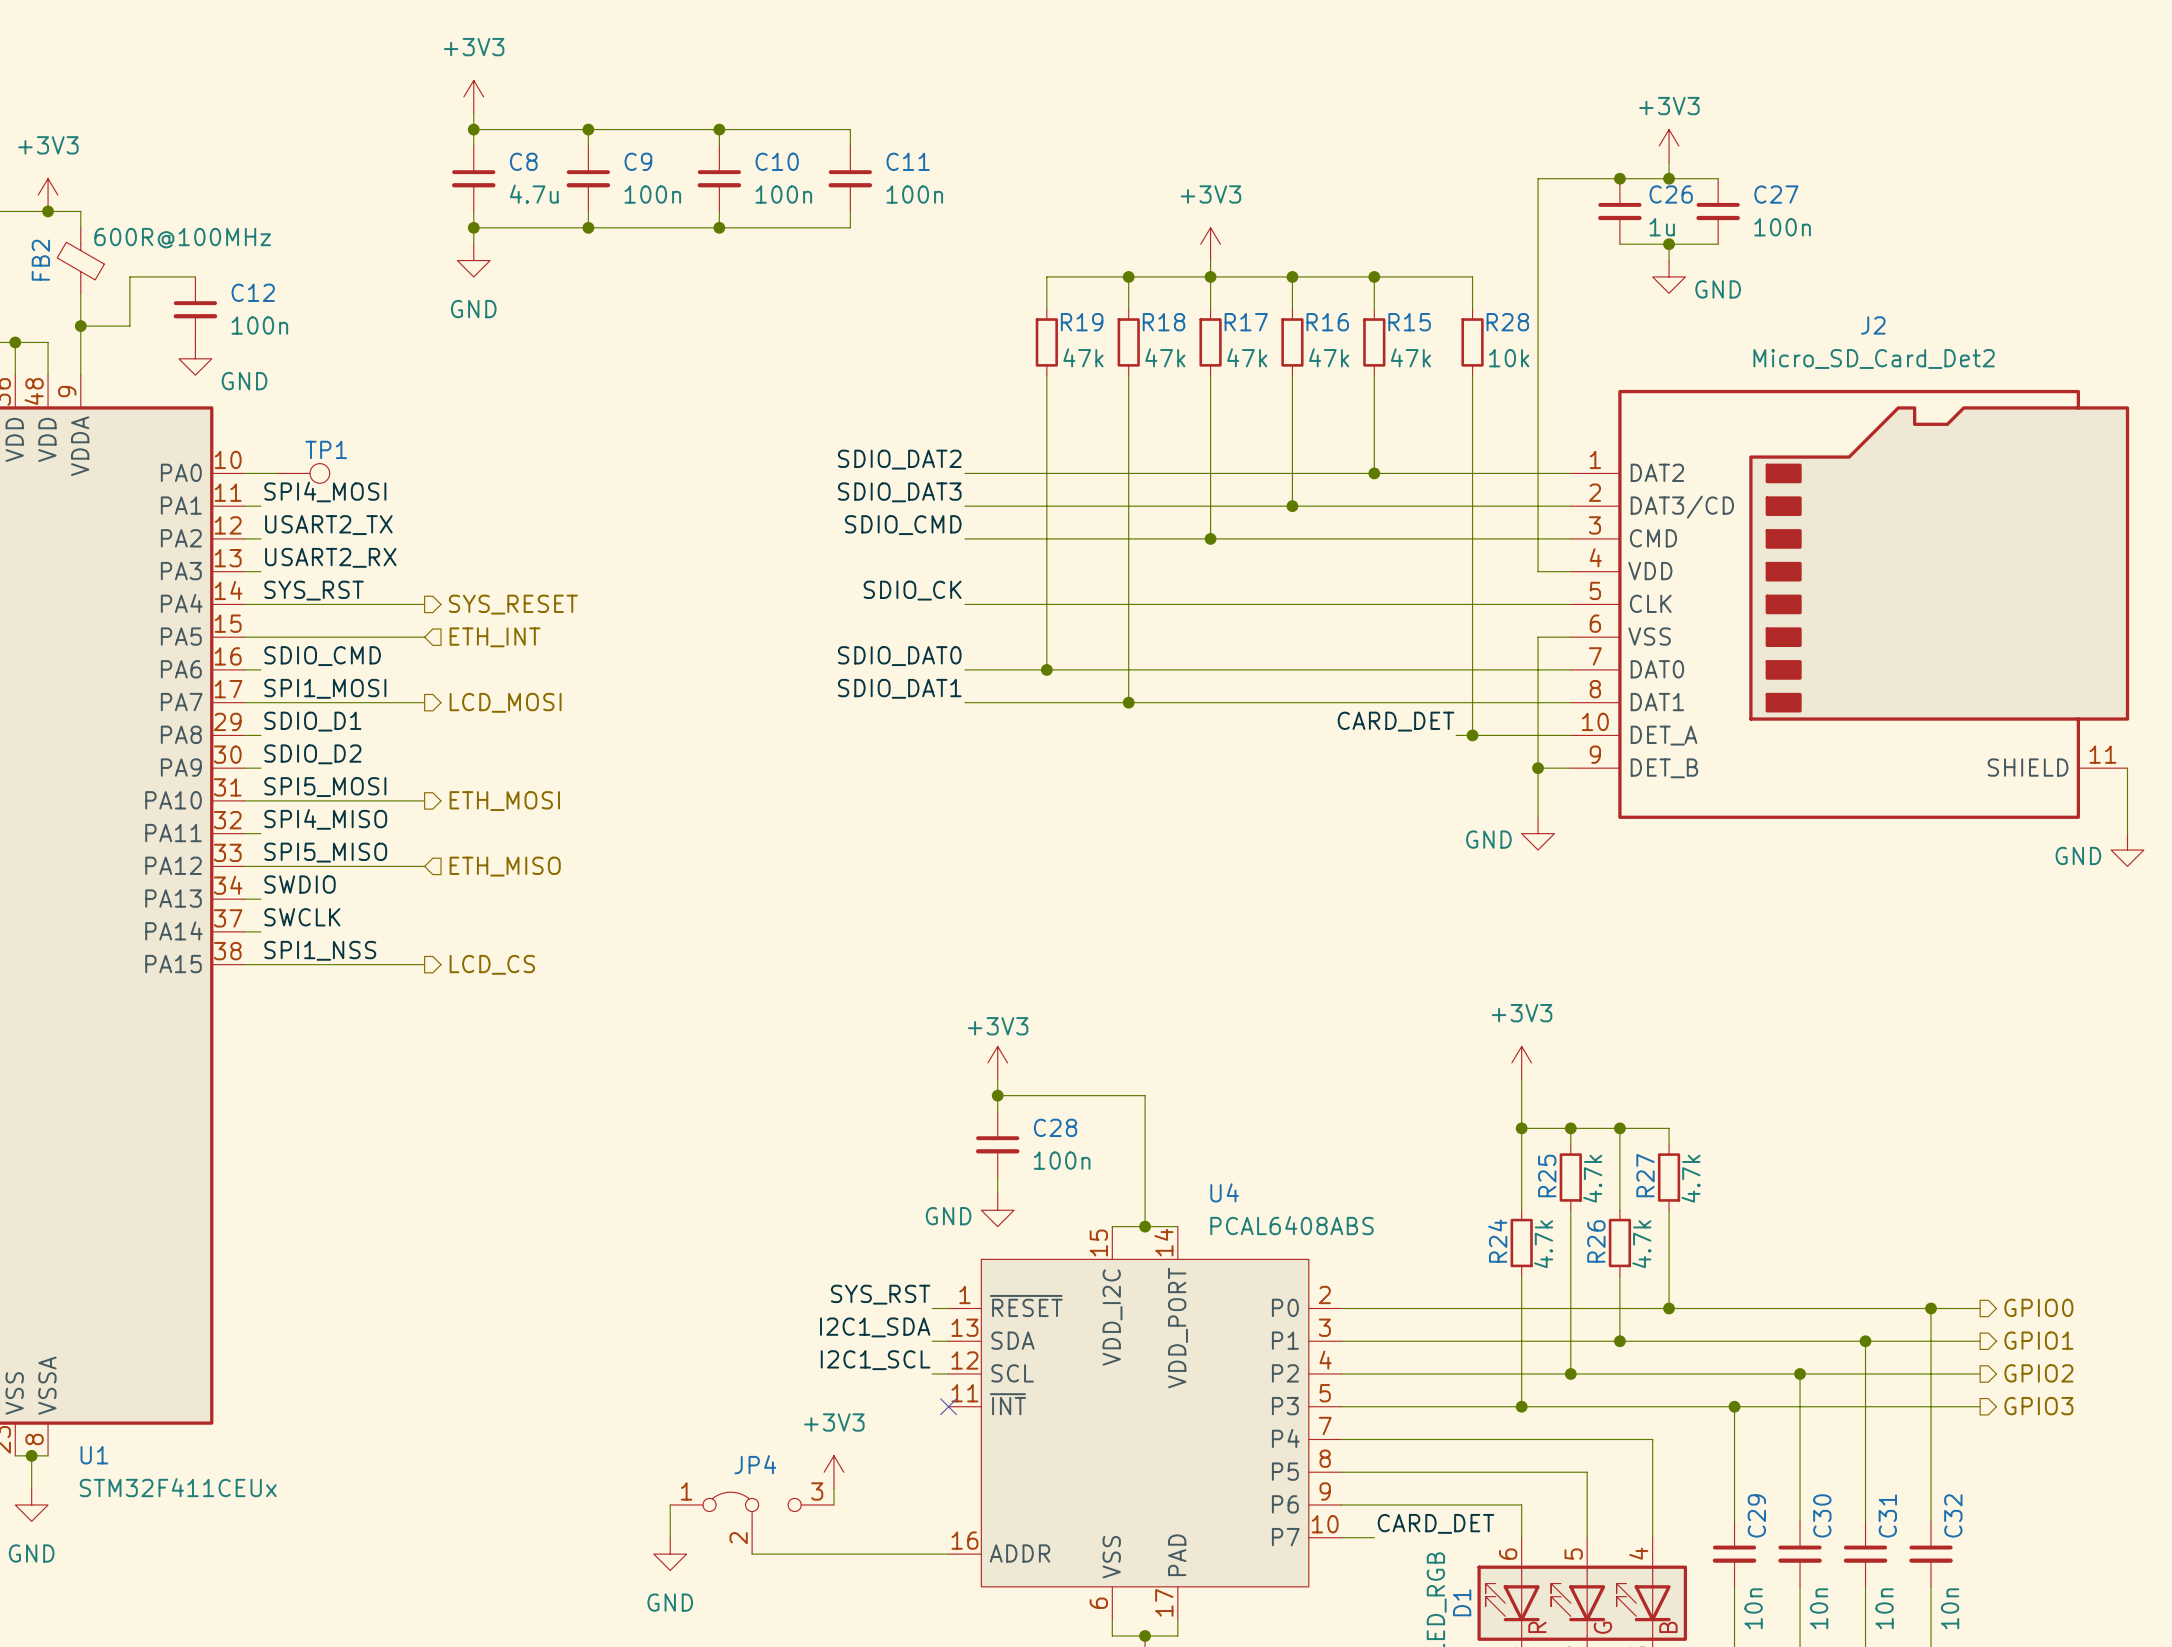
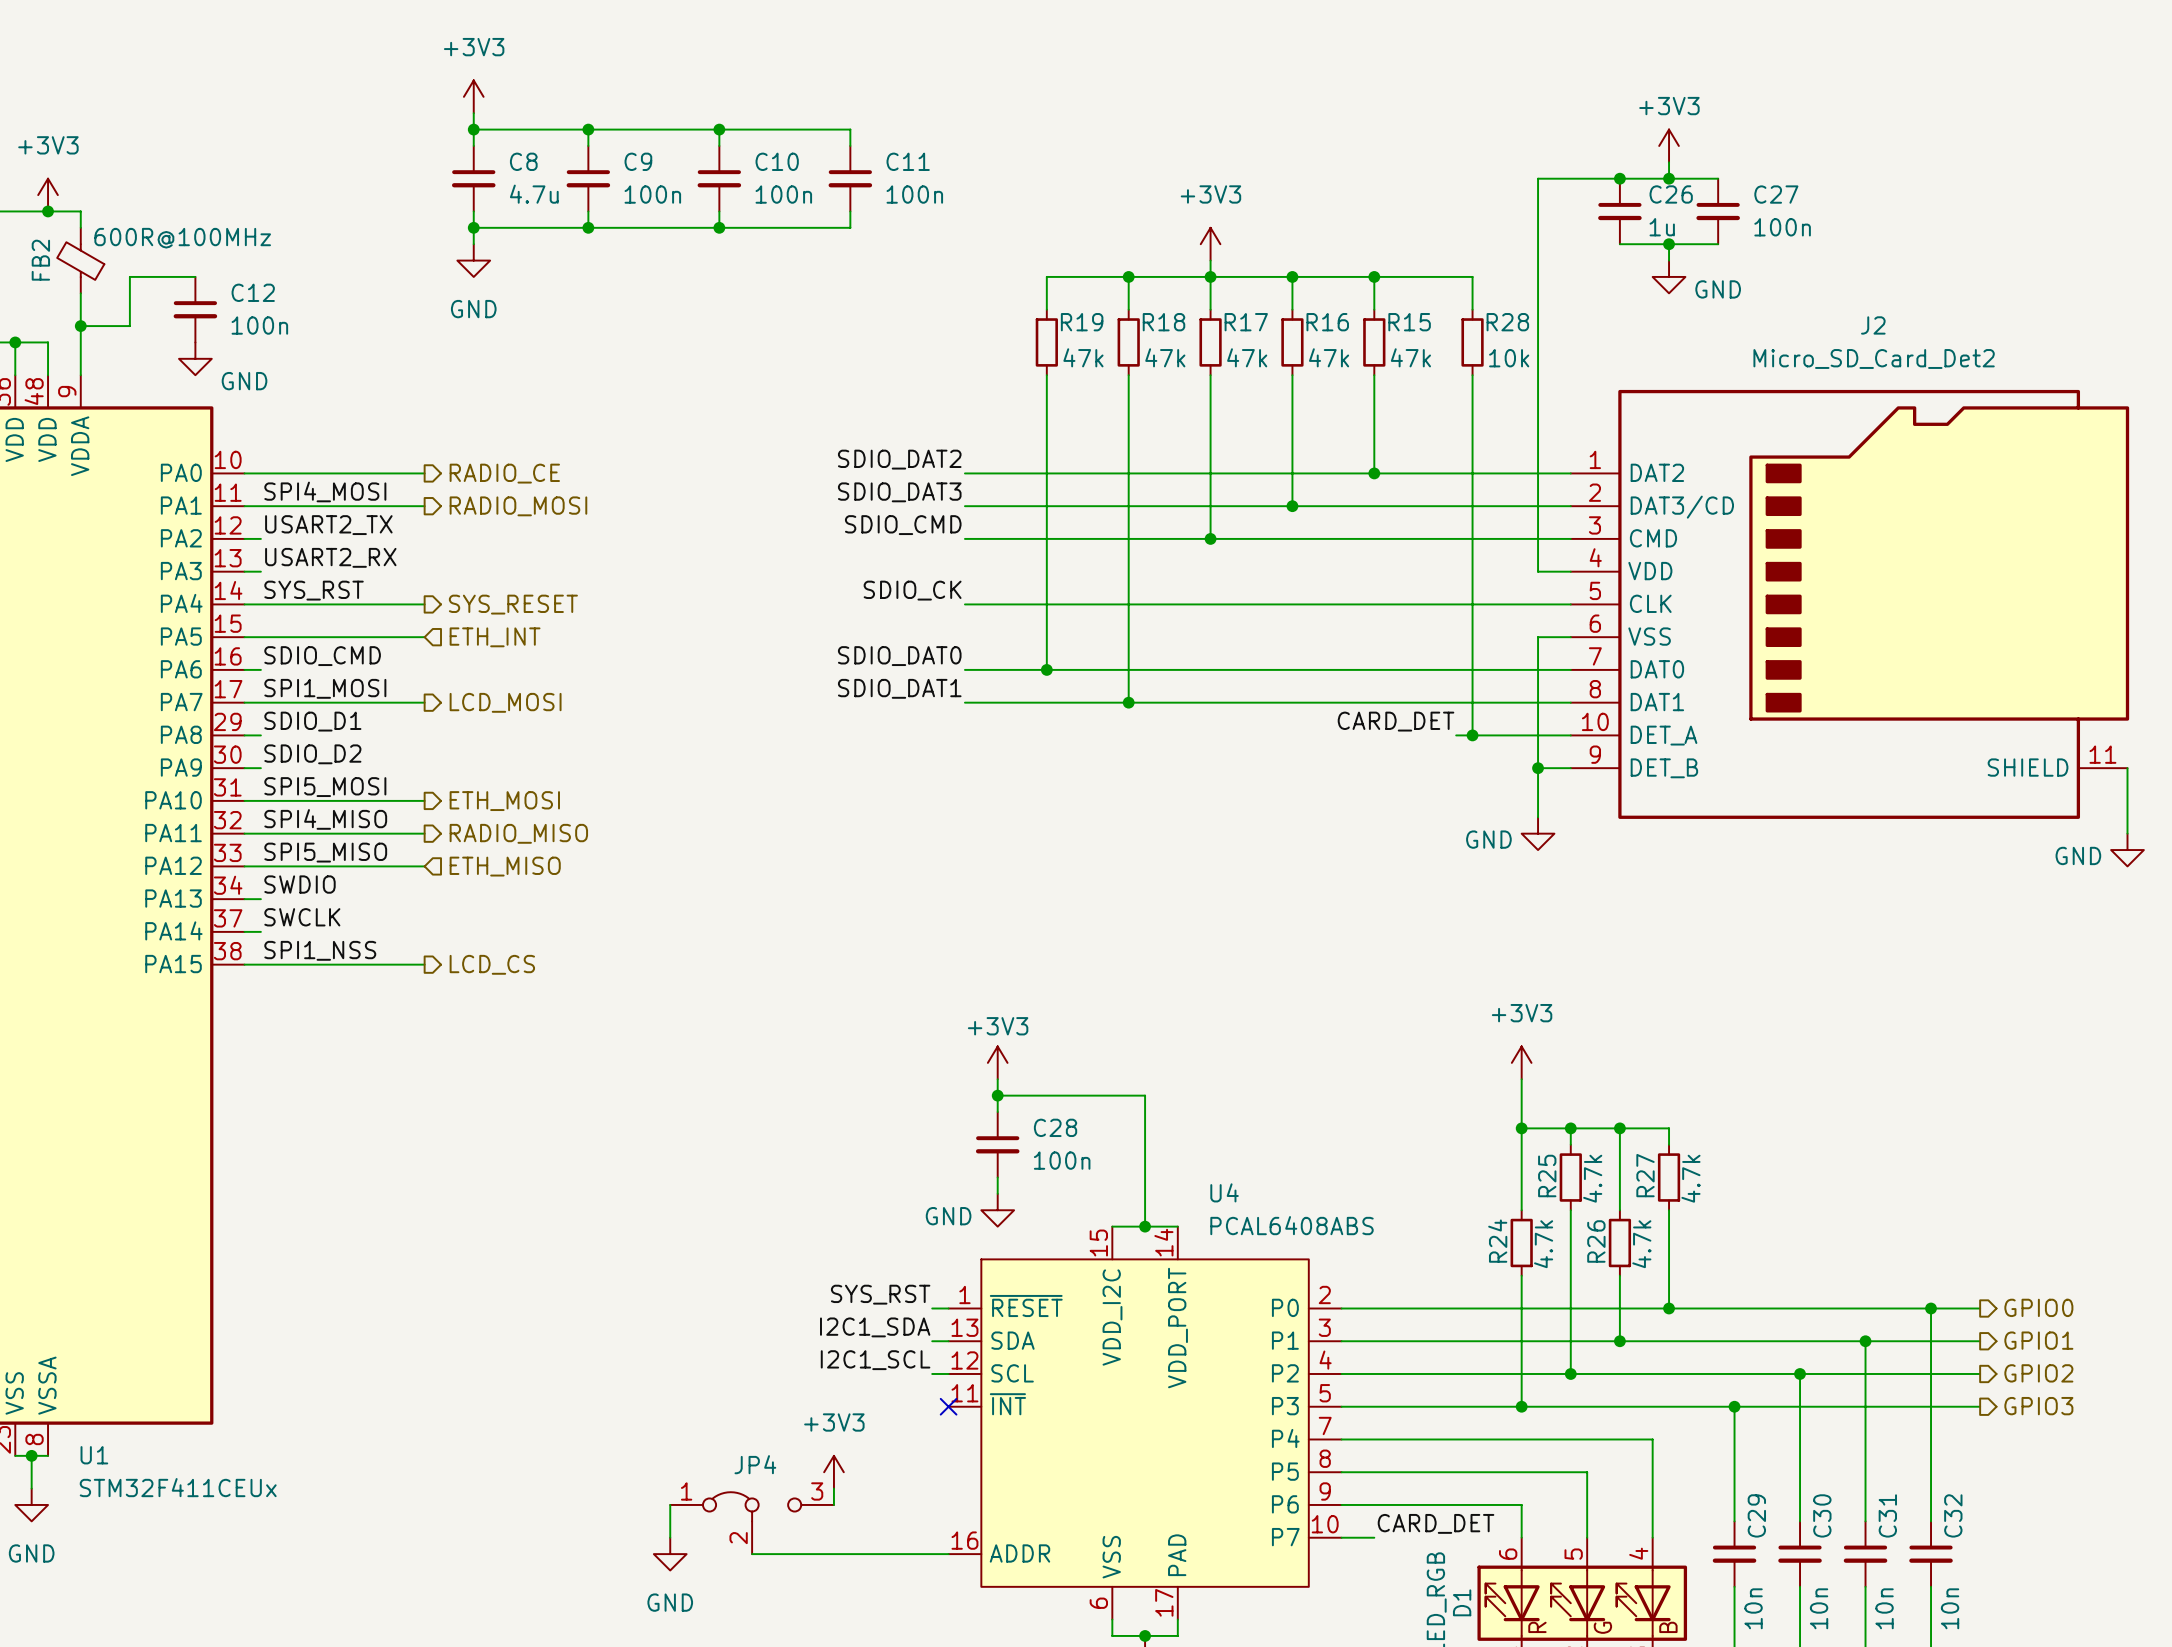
wire: none -> (277, 473) (424, 473)
TP1: (303, 473) -> none
hierarchical label: none -> RADIO_CE (504, 473)
wire: none -> (260, 506) (424, 506)
hierarchical label: none -> RADIO_MOSI (518, 506)
wire: none -> (260, 833) (424, 833)
hierarchical label: none -> RADIO_MISO (518, 833)

